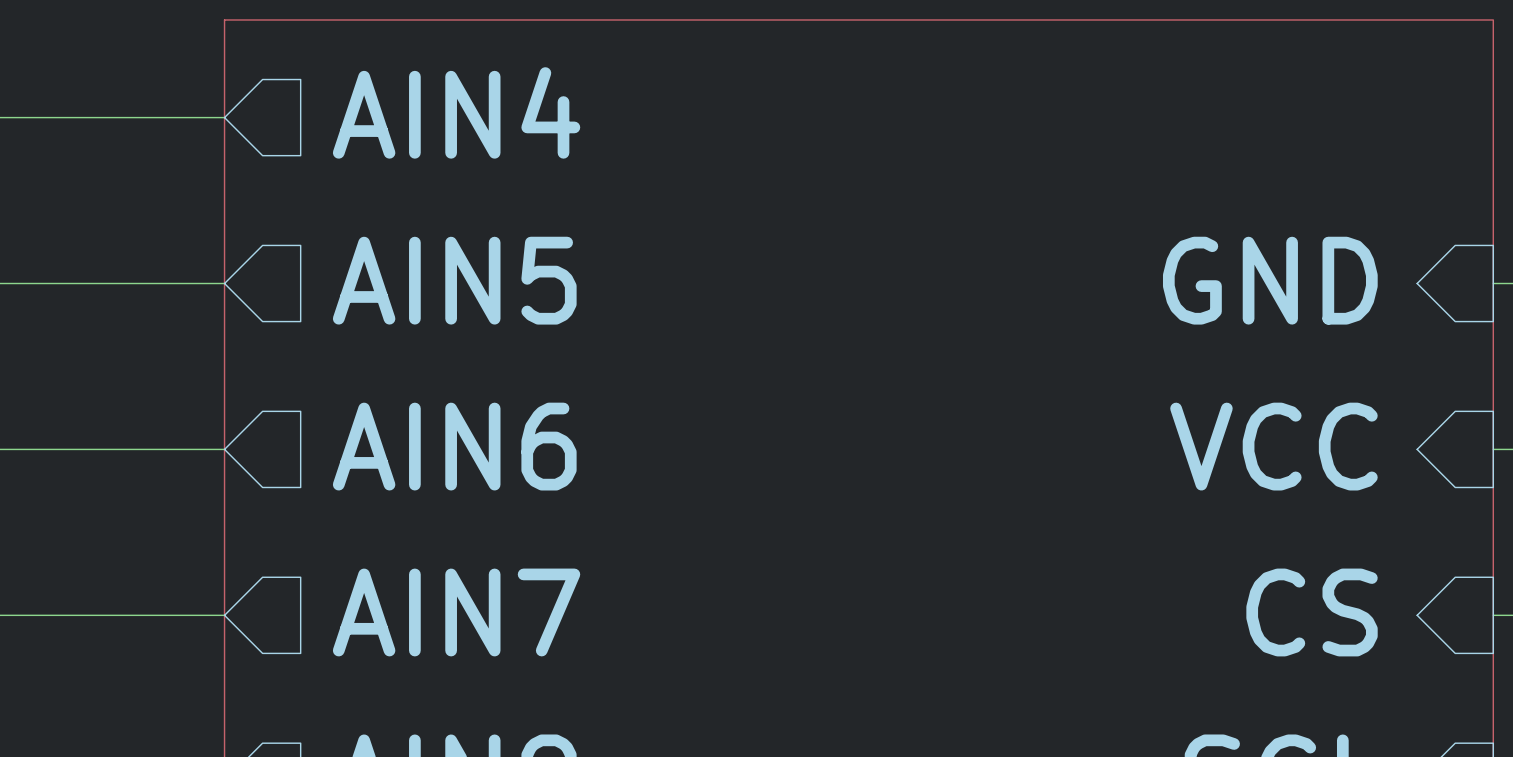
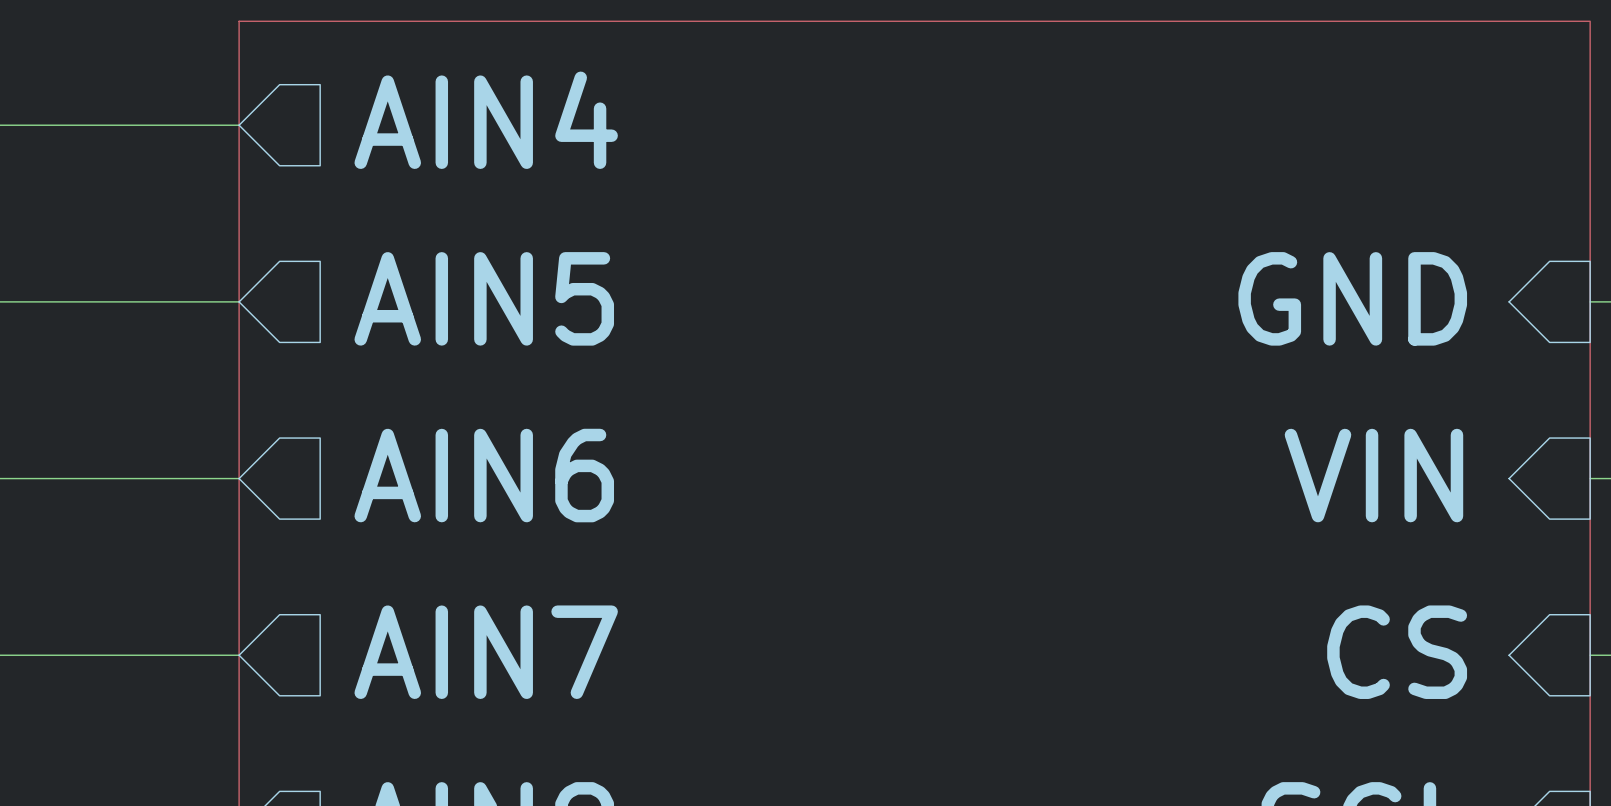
sheet pin: VCC (1273, 446) -> VIN (1373, 475)

